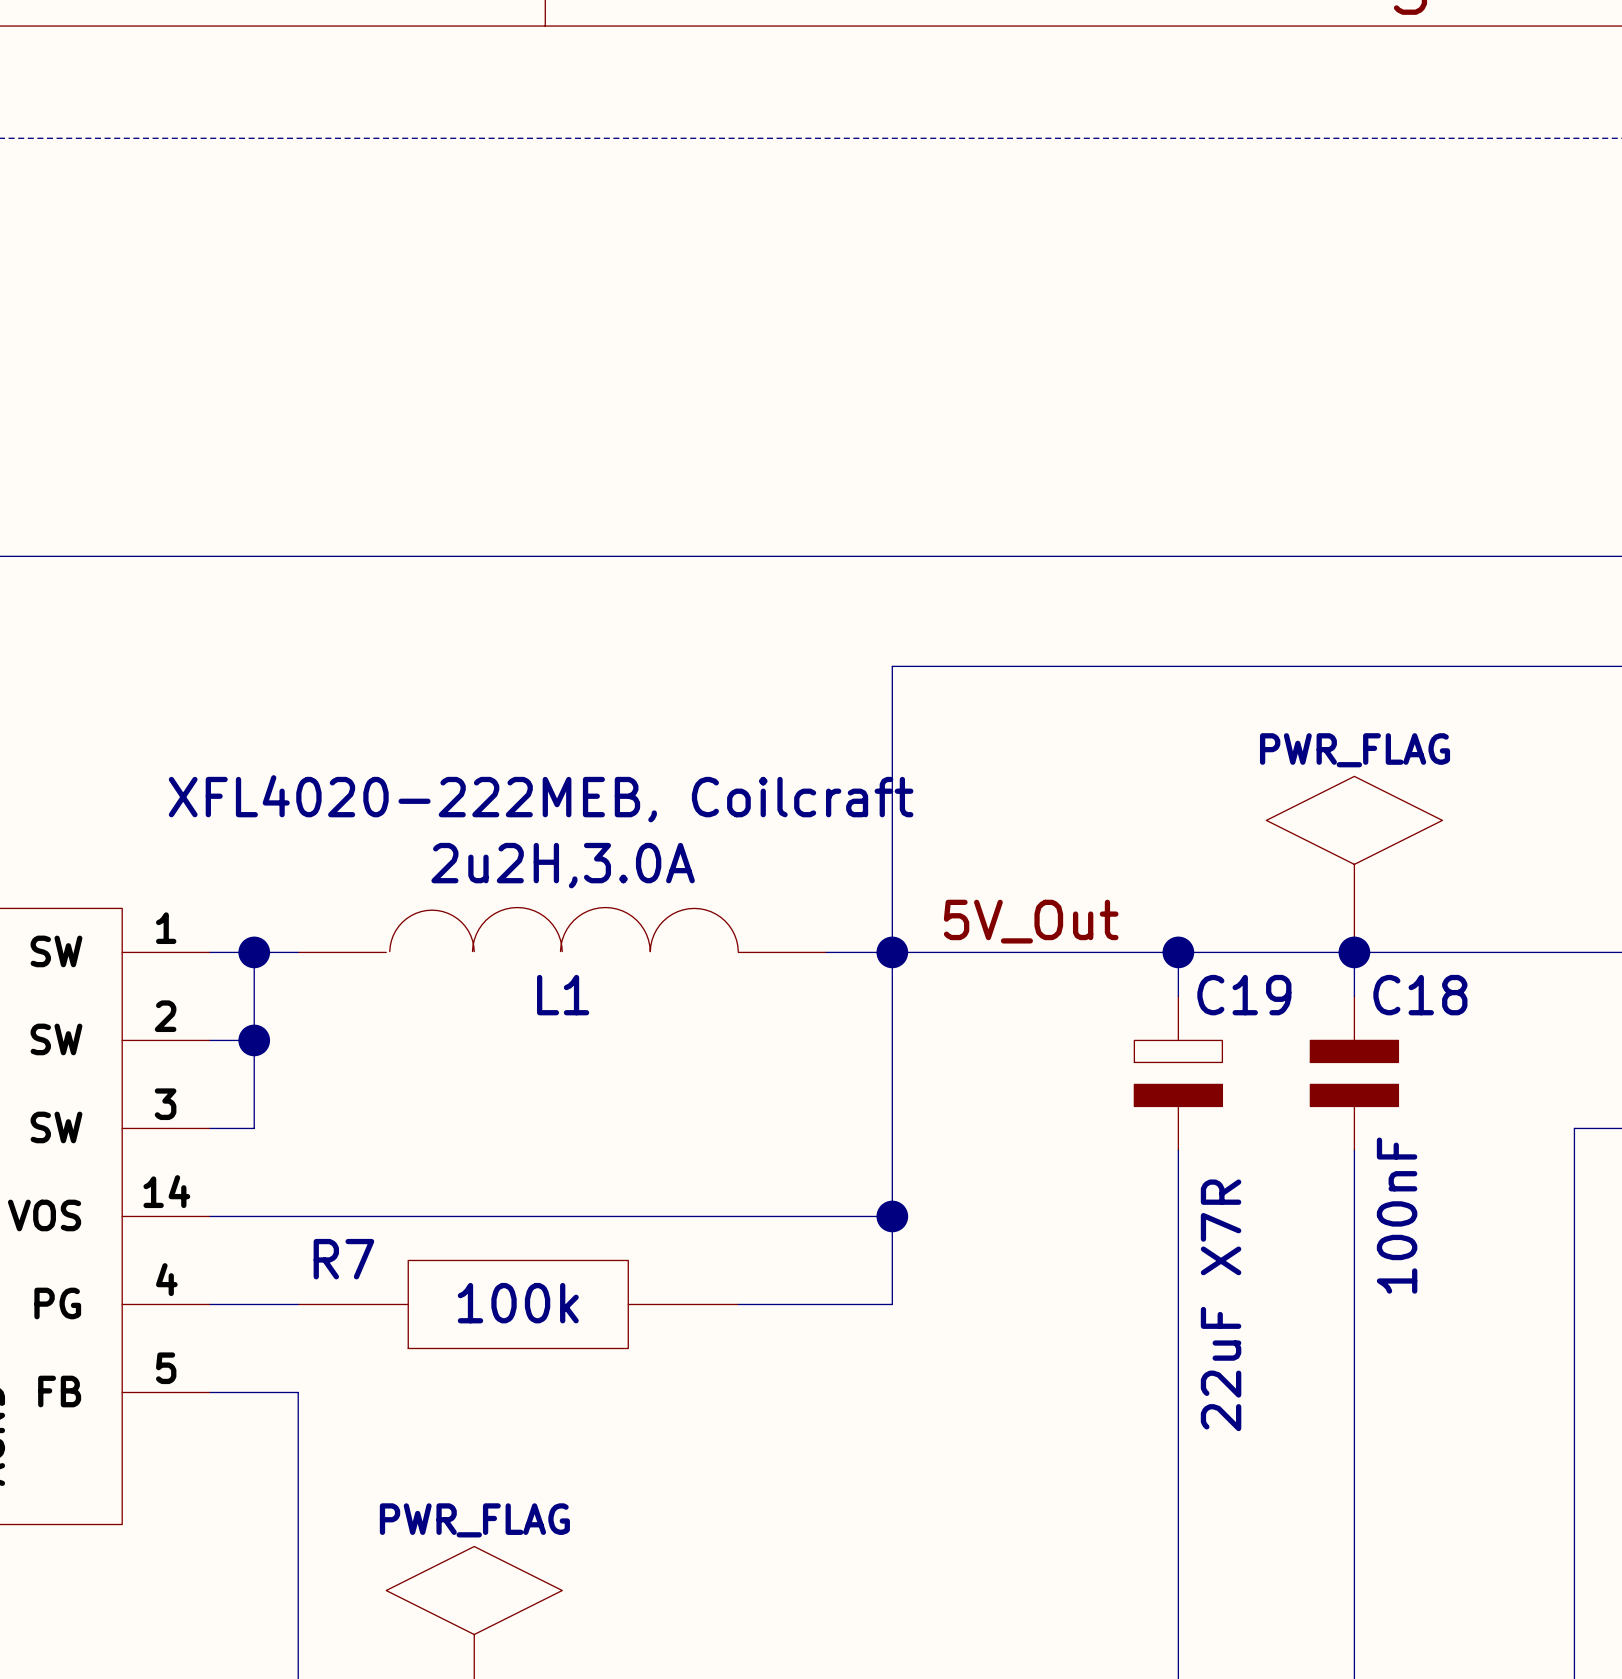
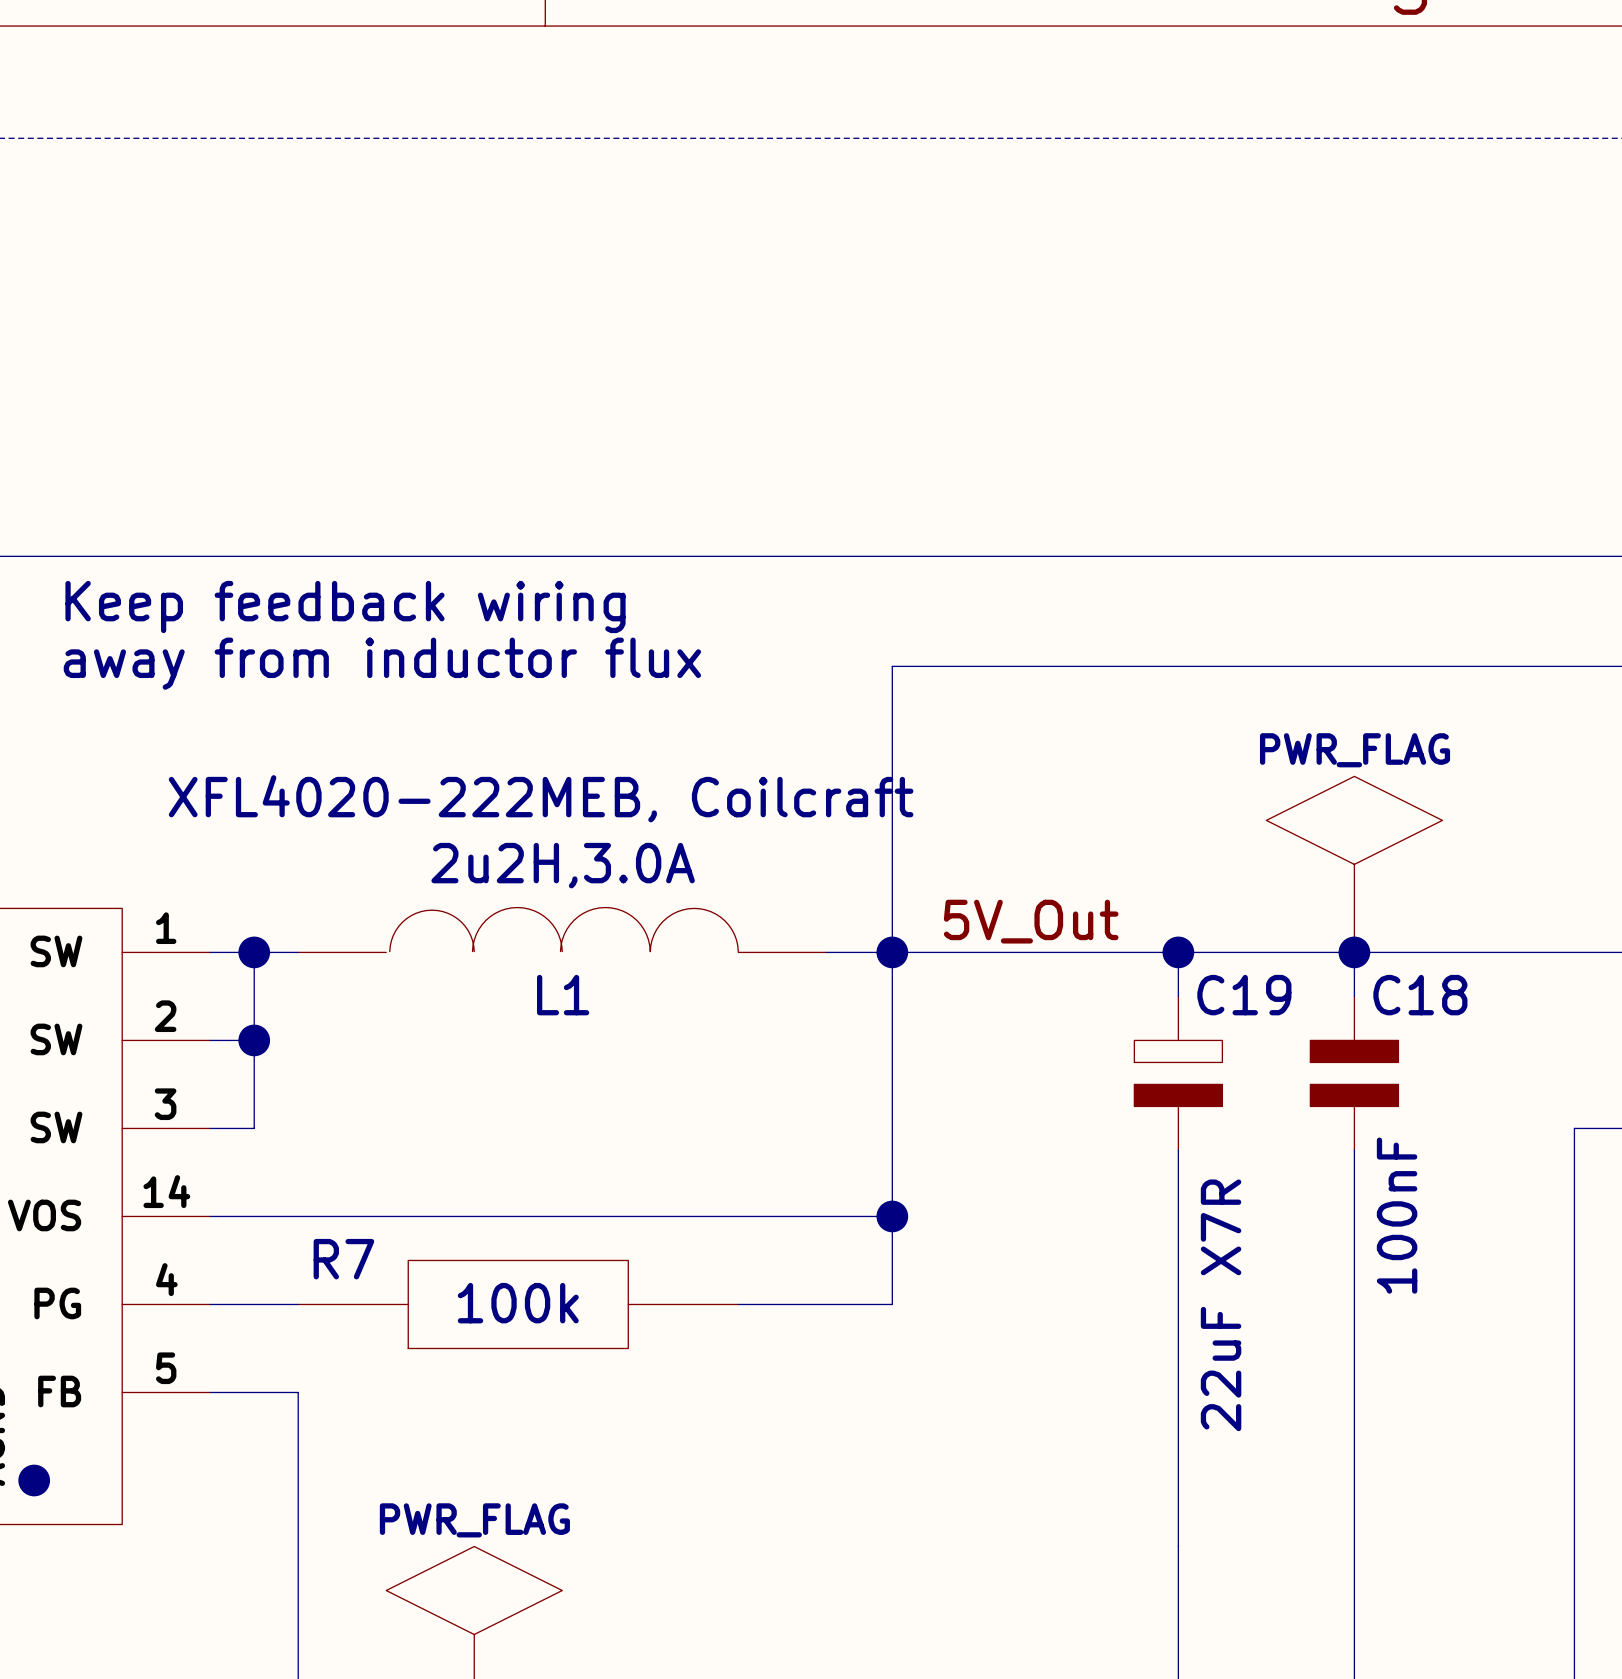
text: none -> Keep feedback wiring (345, 606)
text: none -> away from inductor flux (382, 663)
junction: none -> (34, 1480)

